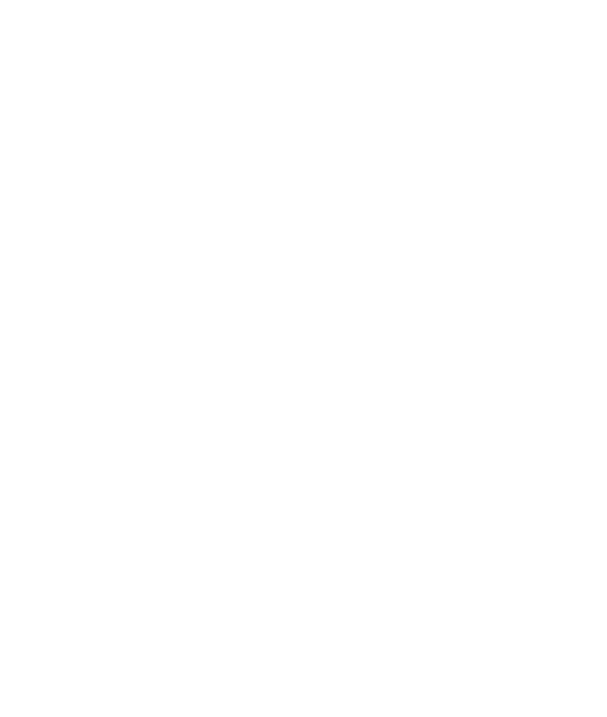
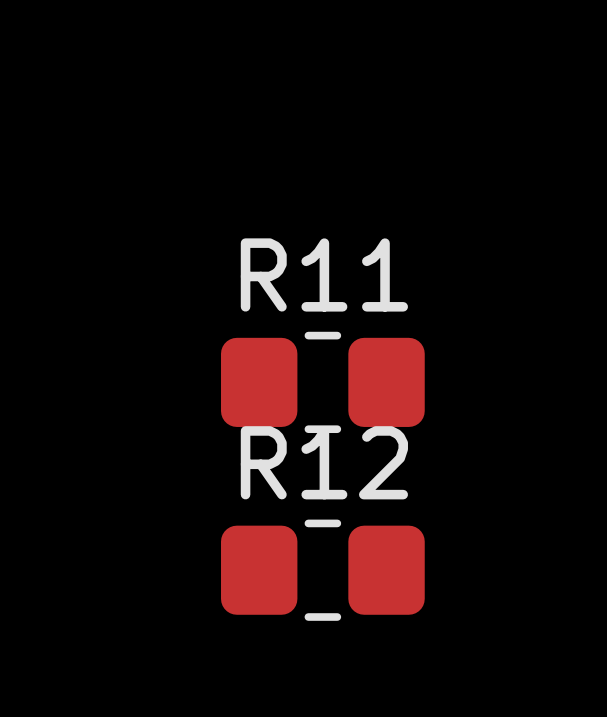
R11: none -> (322, 382)
R12: none -> (322, 570)

